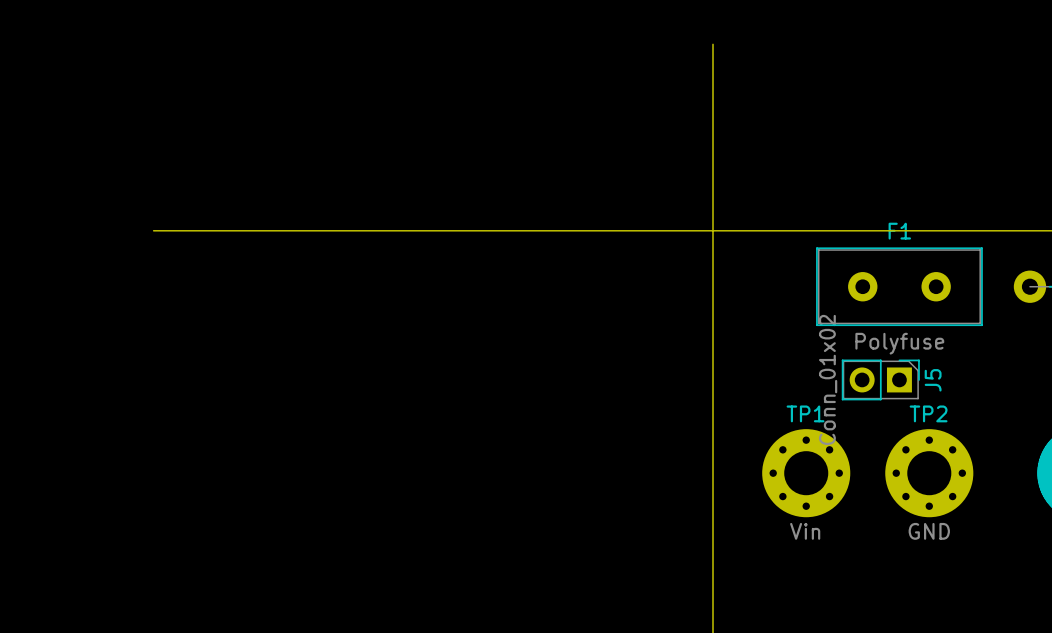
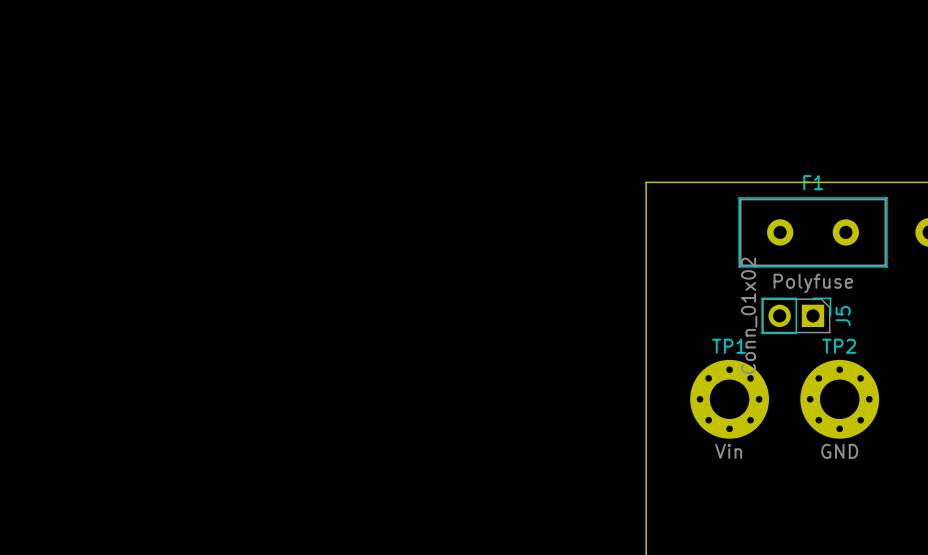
board edge: (713, 44) (713, 230) (153, 230) -> none

